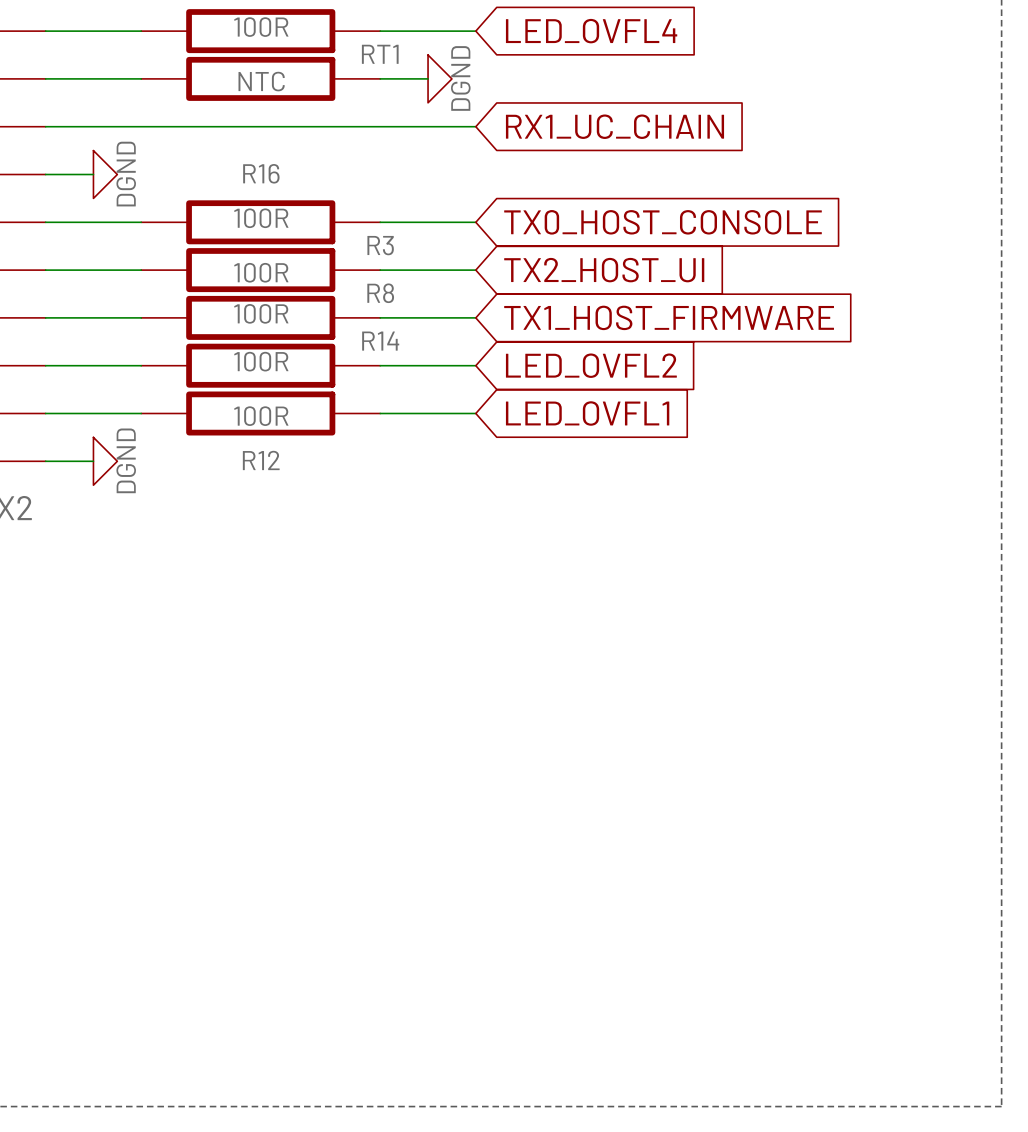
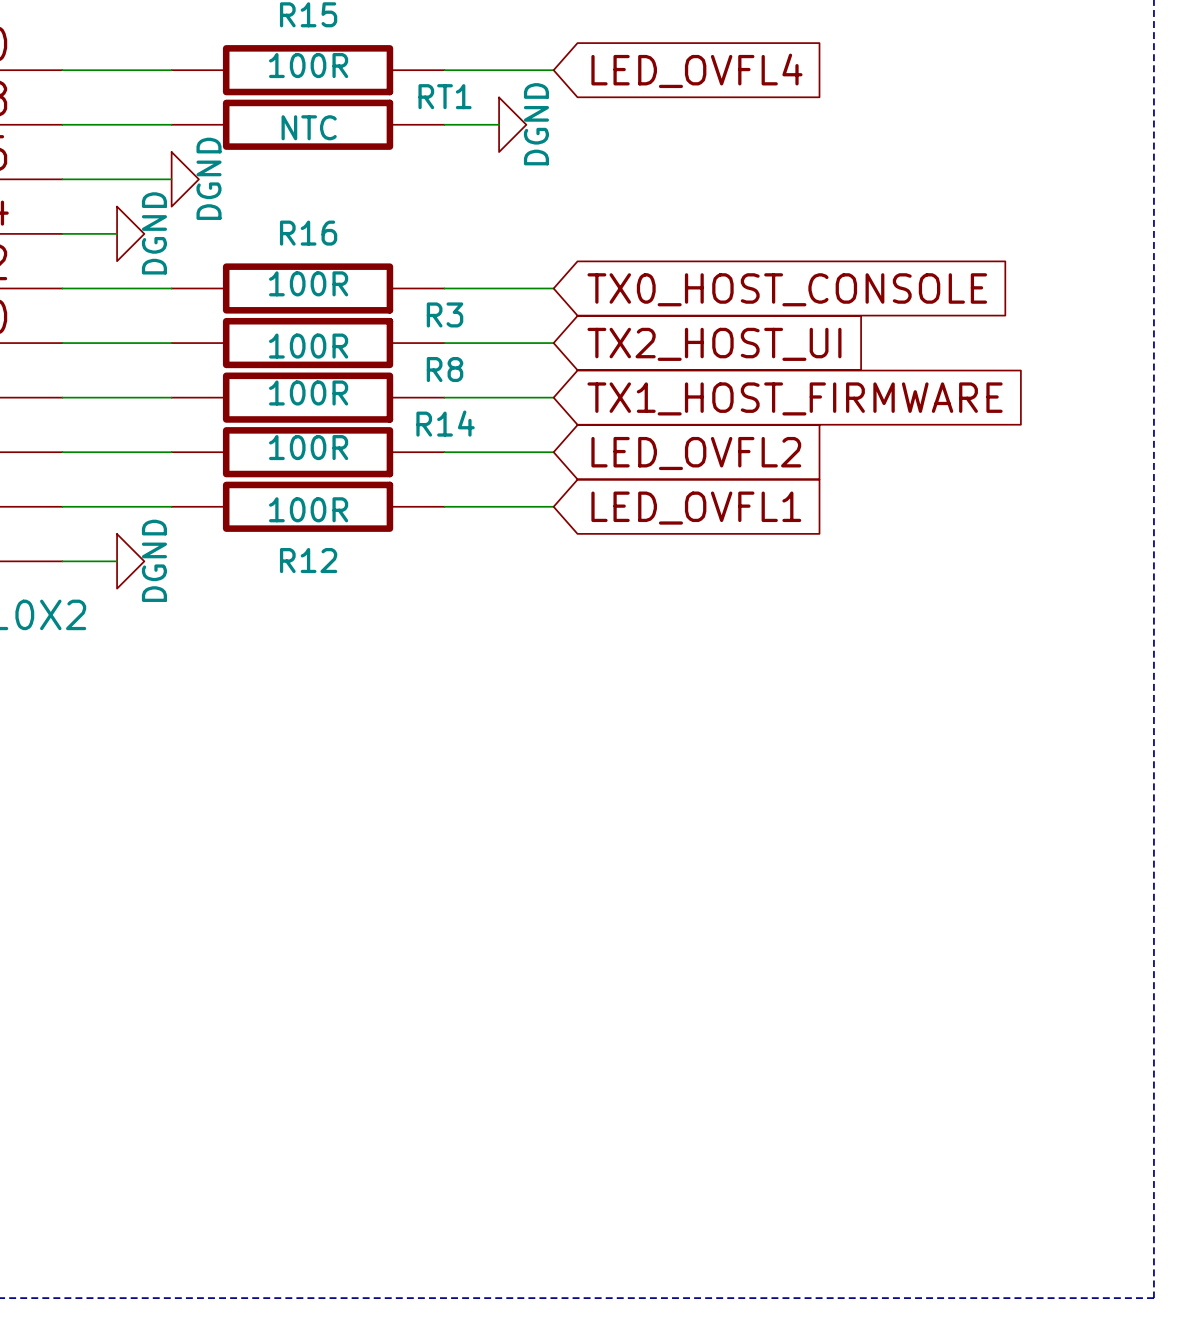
wire: (141, 126) (475, 126) -> none
power symbol: none -> DGND (185, 179)
global label: RX1_UC_CHAIN (614, 126) -> none

